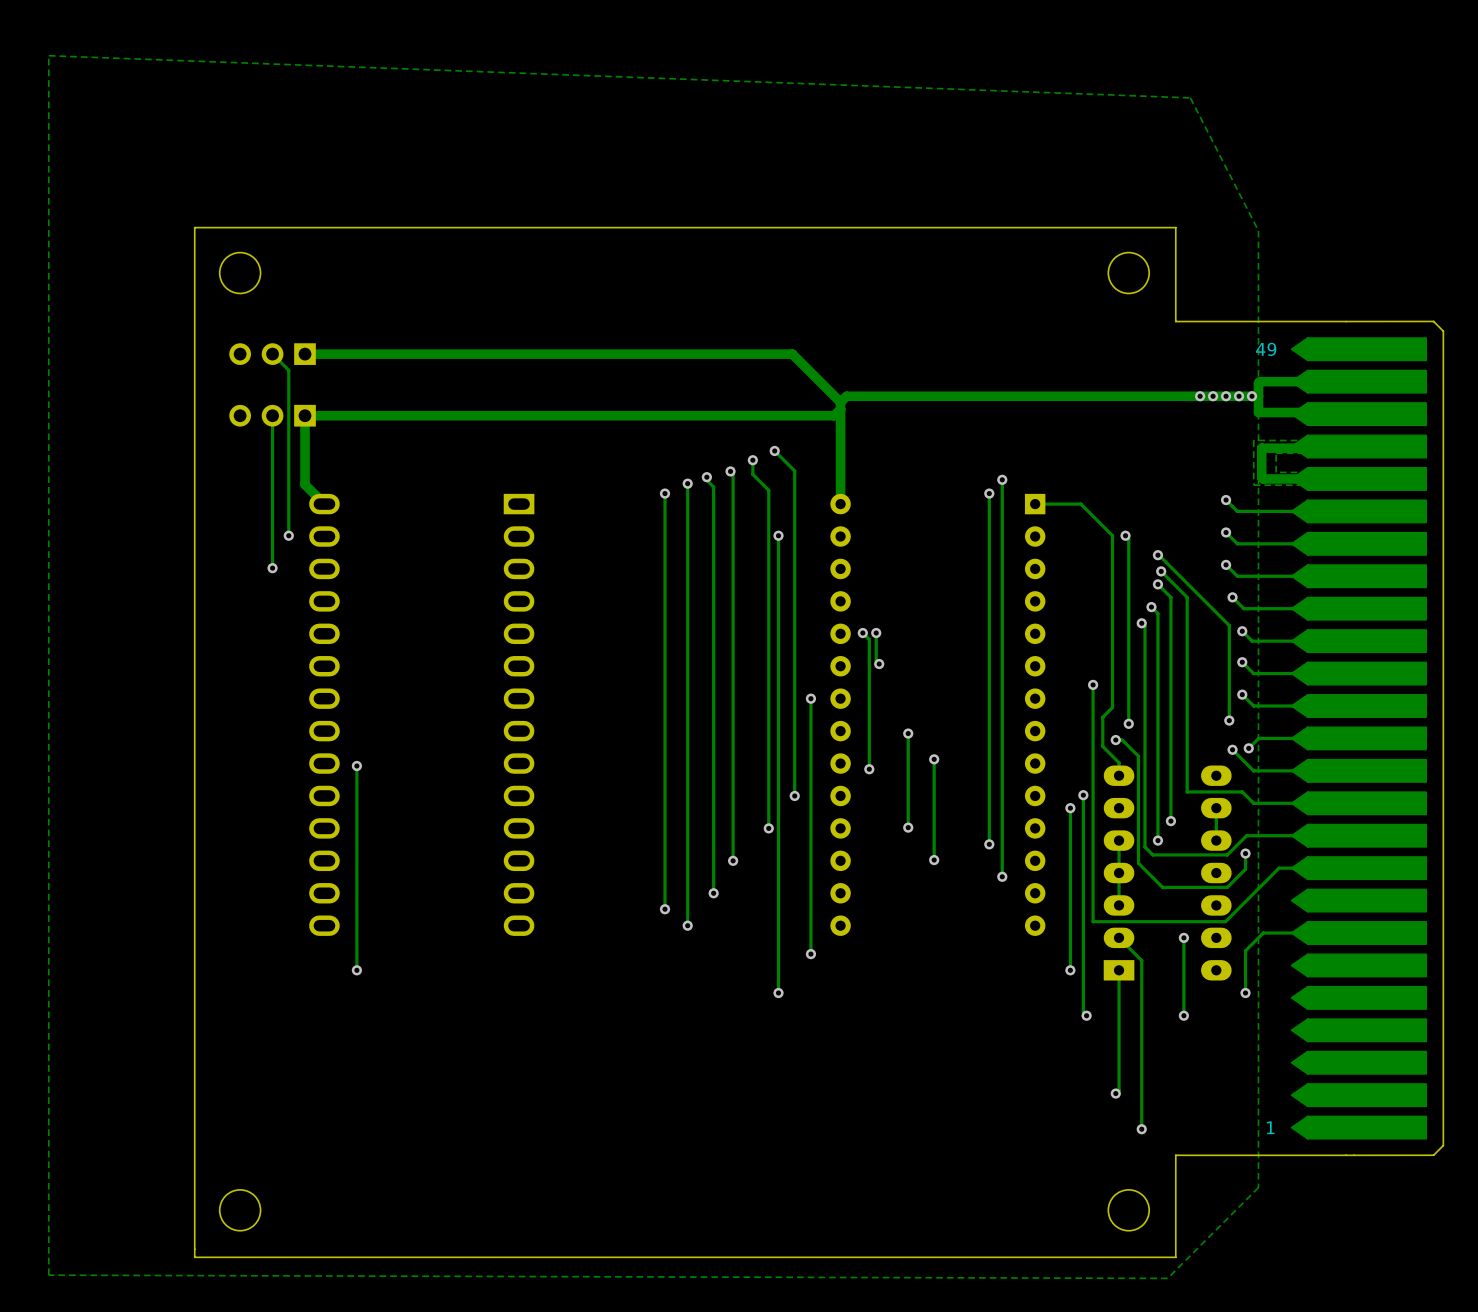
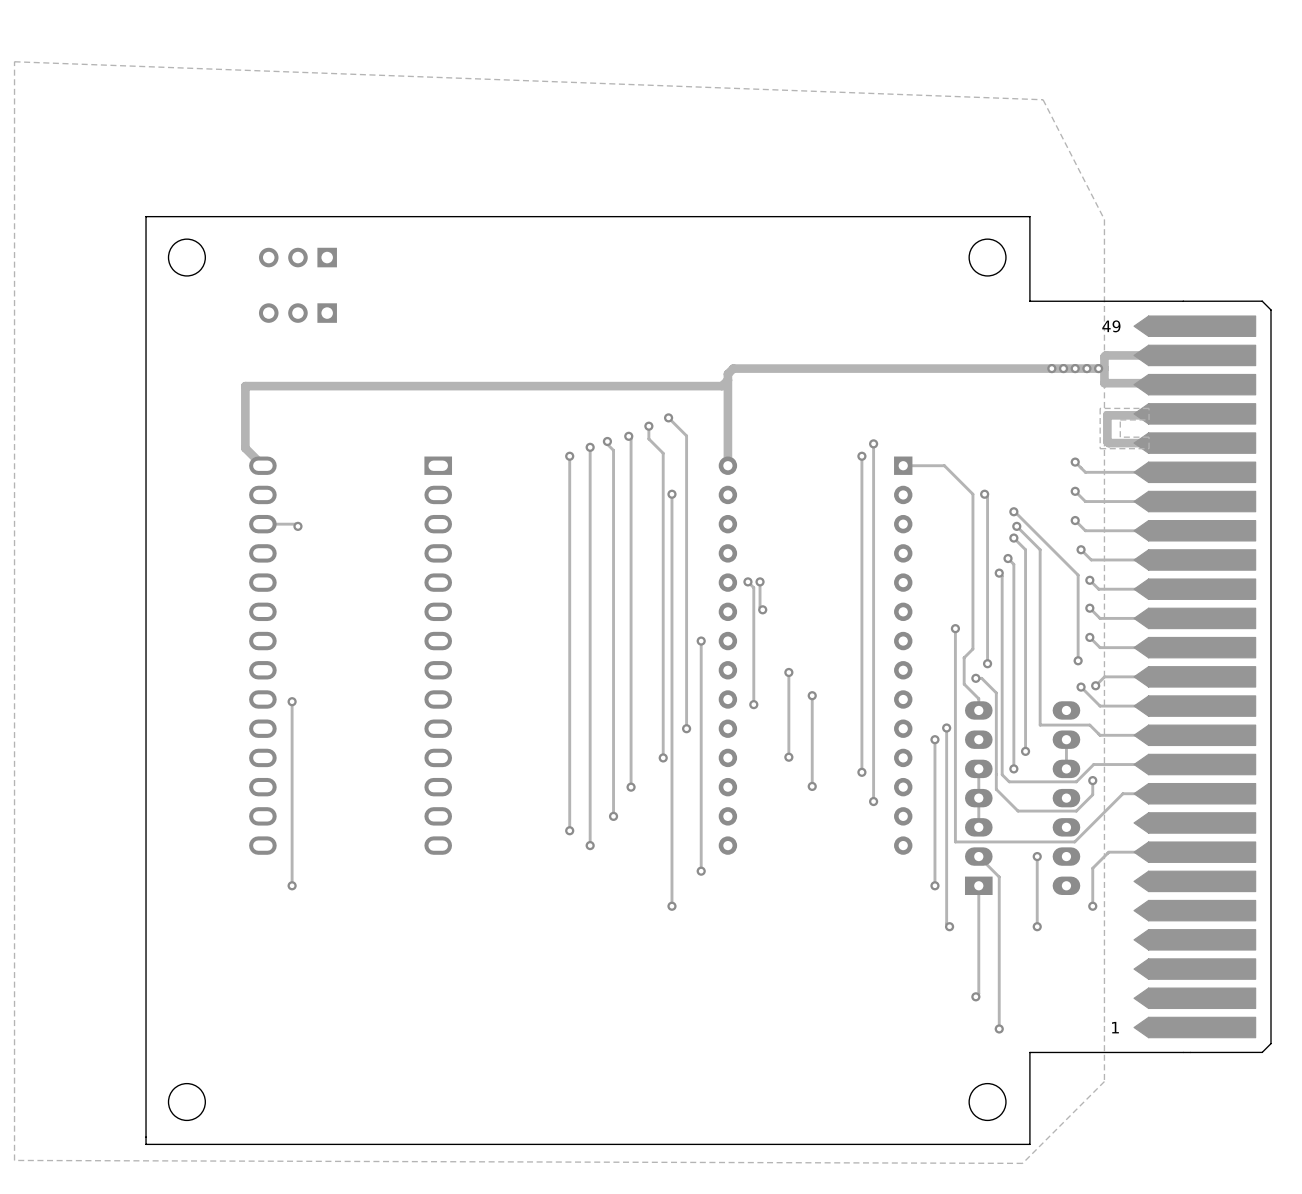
part: none -> (297, 257)
part: none -> (297, 313)
track: (272, 354) (288, 370) (288, 535) -> none
part: (272, 354) -> none
track: (305, 354) (792, 354) (840, 402) -> none
track: (272, 415) (272, 568) -> none
part: (272, 415) -> none
via: (288, 535) -> none
via: (272, 568) -> none
track: none -> (262, 524) (295, 524) (297, 526)
via: none -> (297, 526)

